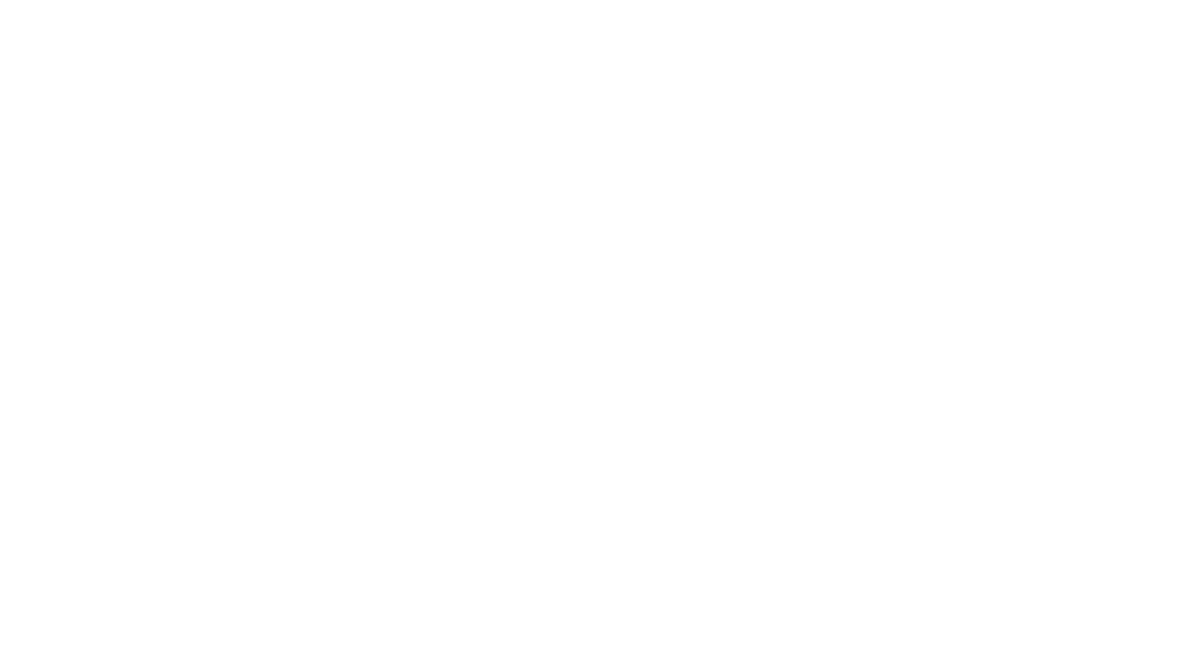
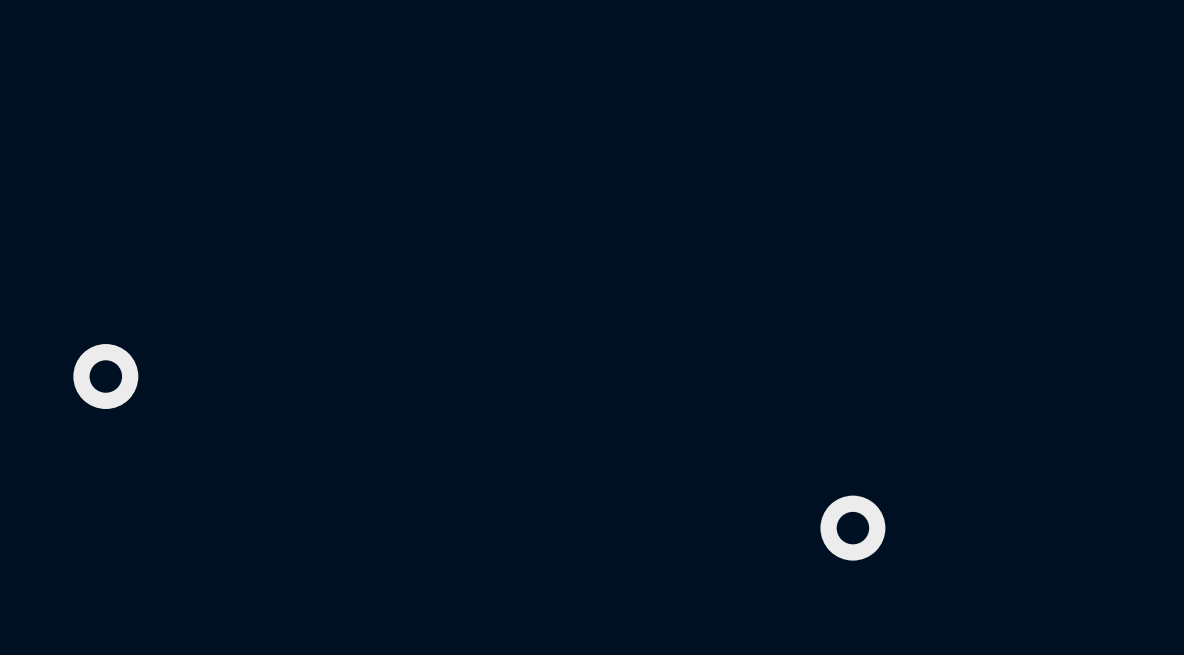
via: none -> (105, 376)
via: none -> (852, 528)

